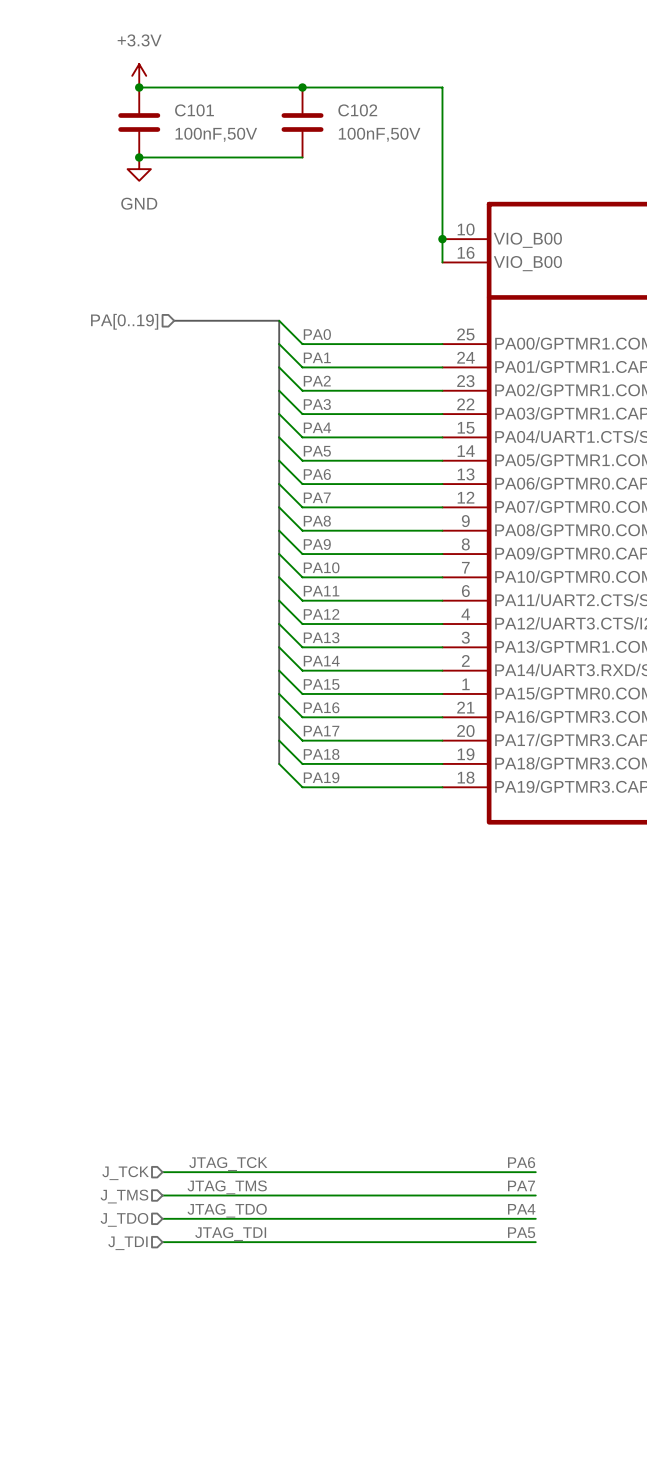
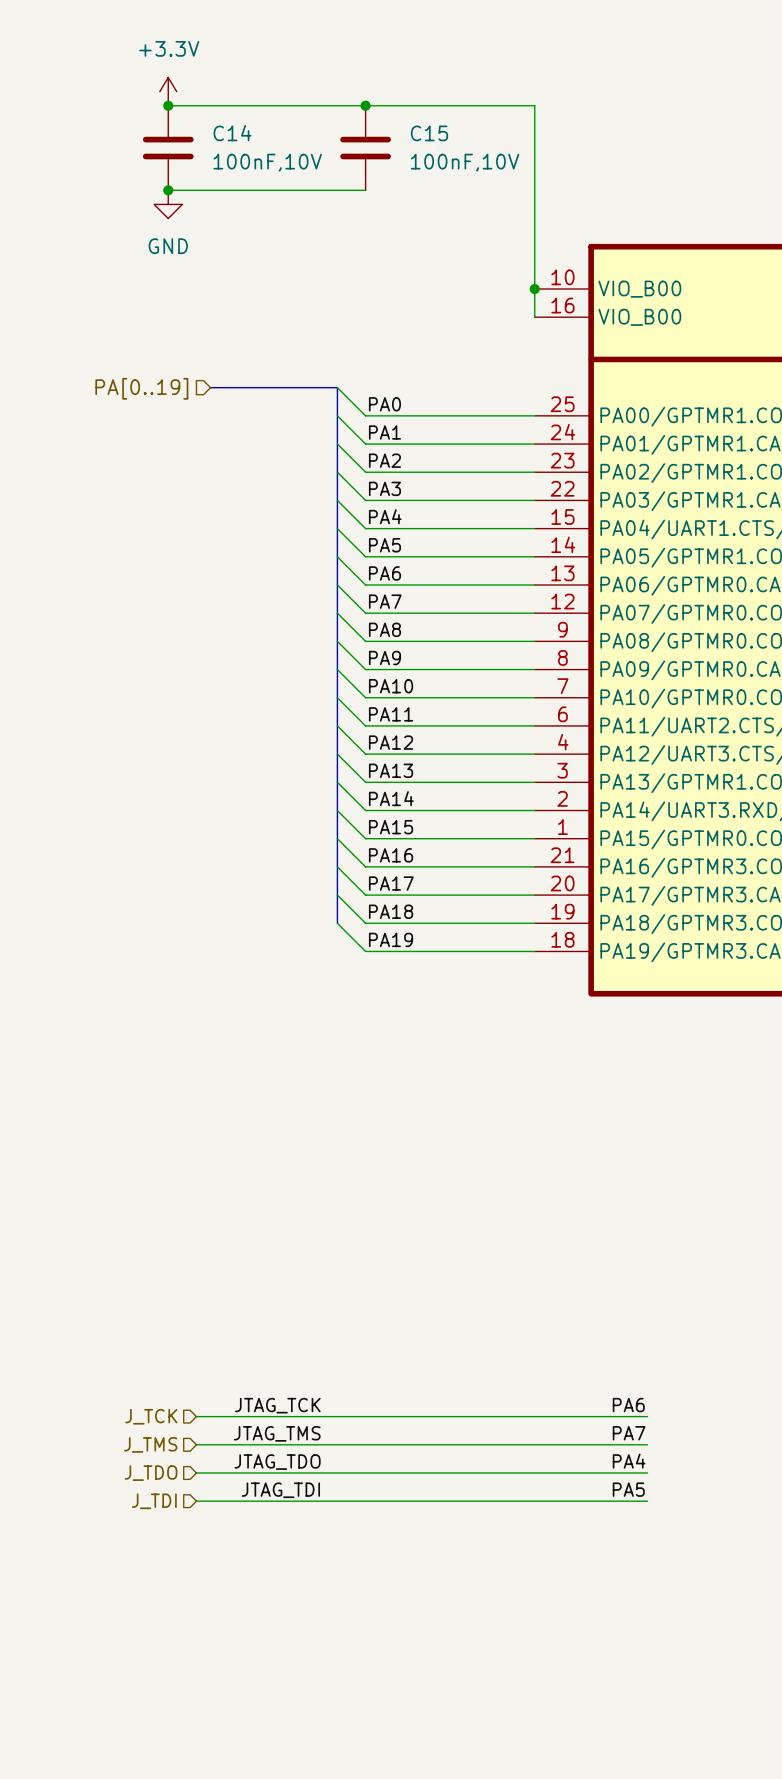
C101 name: C101 (194, 110) -> C14 (232, 133)
C102 name: C102 (357, 110) -> C15 (429, 133)
C101 value: 100nF,50V (216, 134) -> 100nF,10V (267, 162)
C102 value: 100nF,50V (379, 134) -> 100nF,10V (465, 162)

